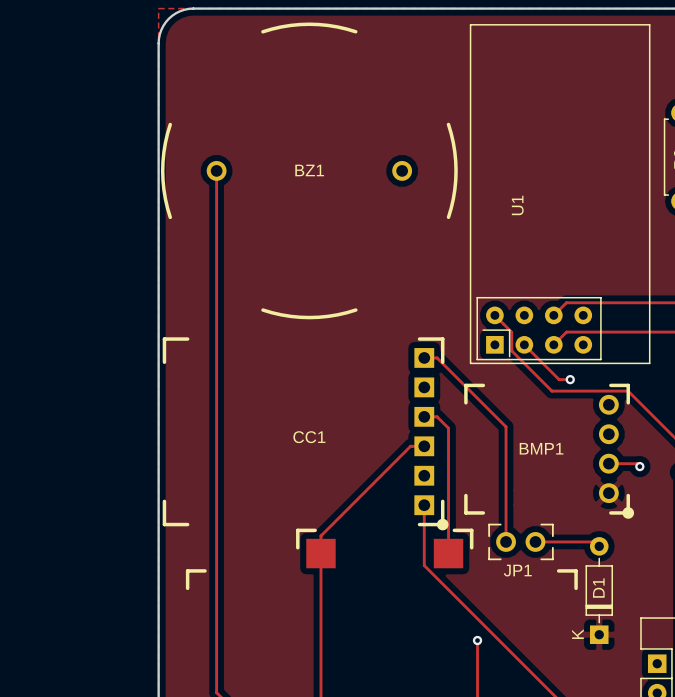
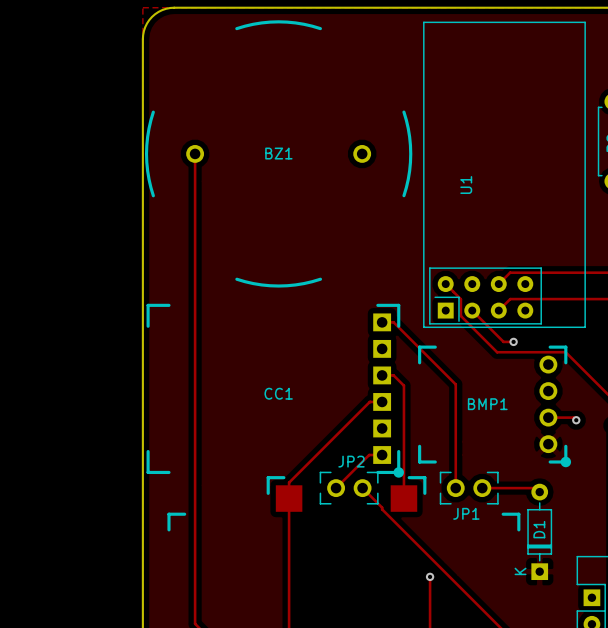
track: (424, 505) (424, 563) -> (362, 488) (382, 507)
track: none -> (382, 455) (369, 455) (336, 488)
JP2: none -> (349, 488)

